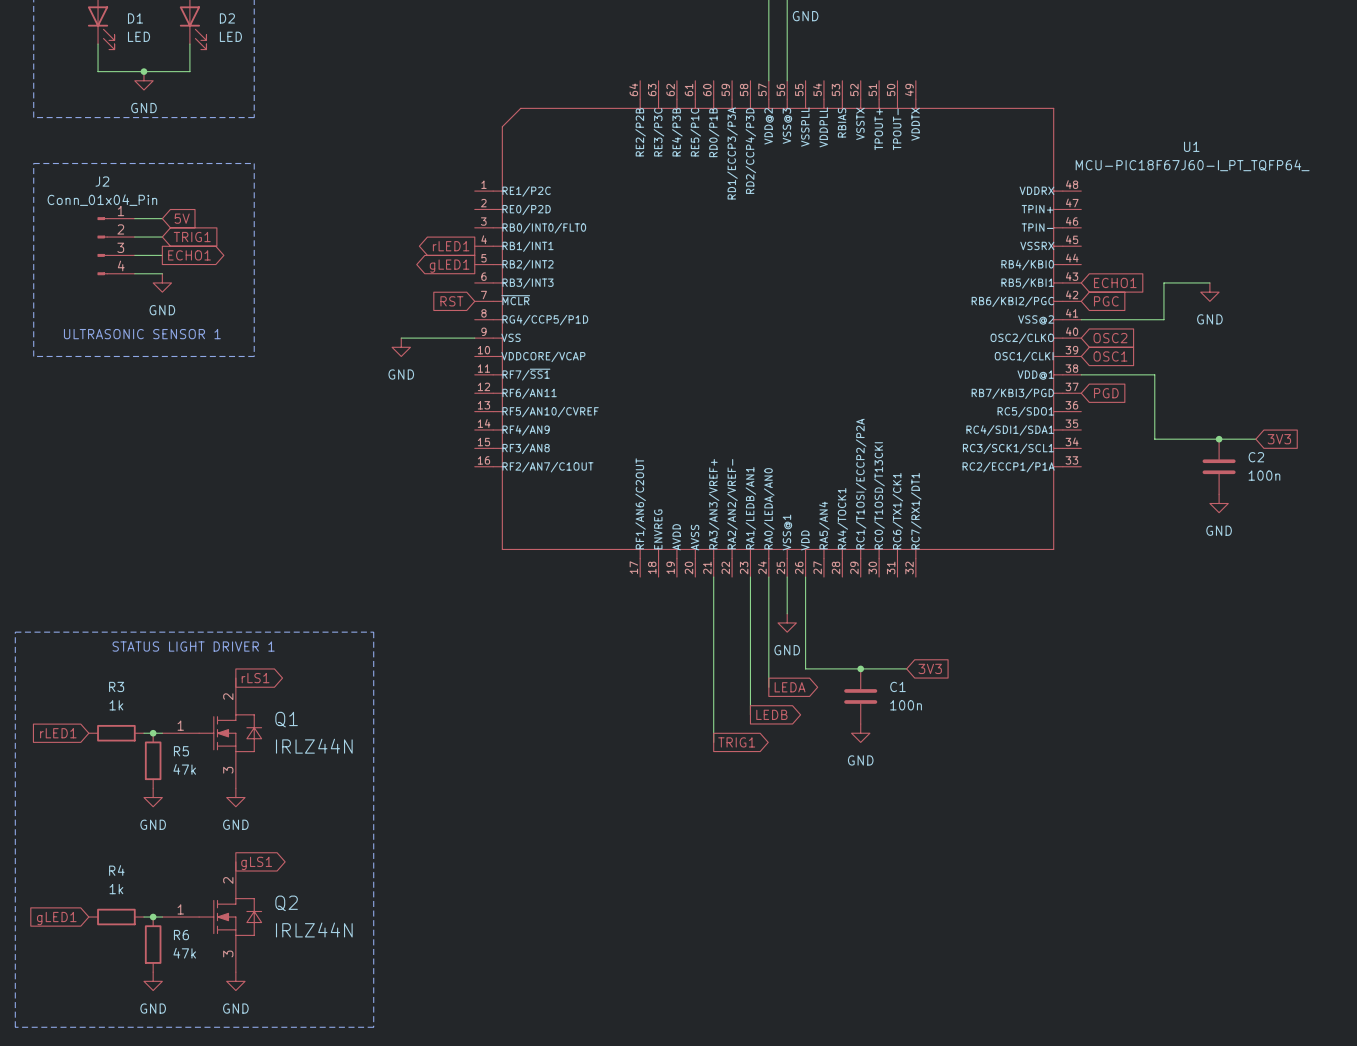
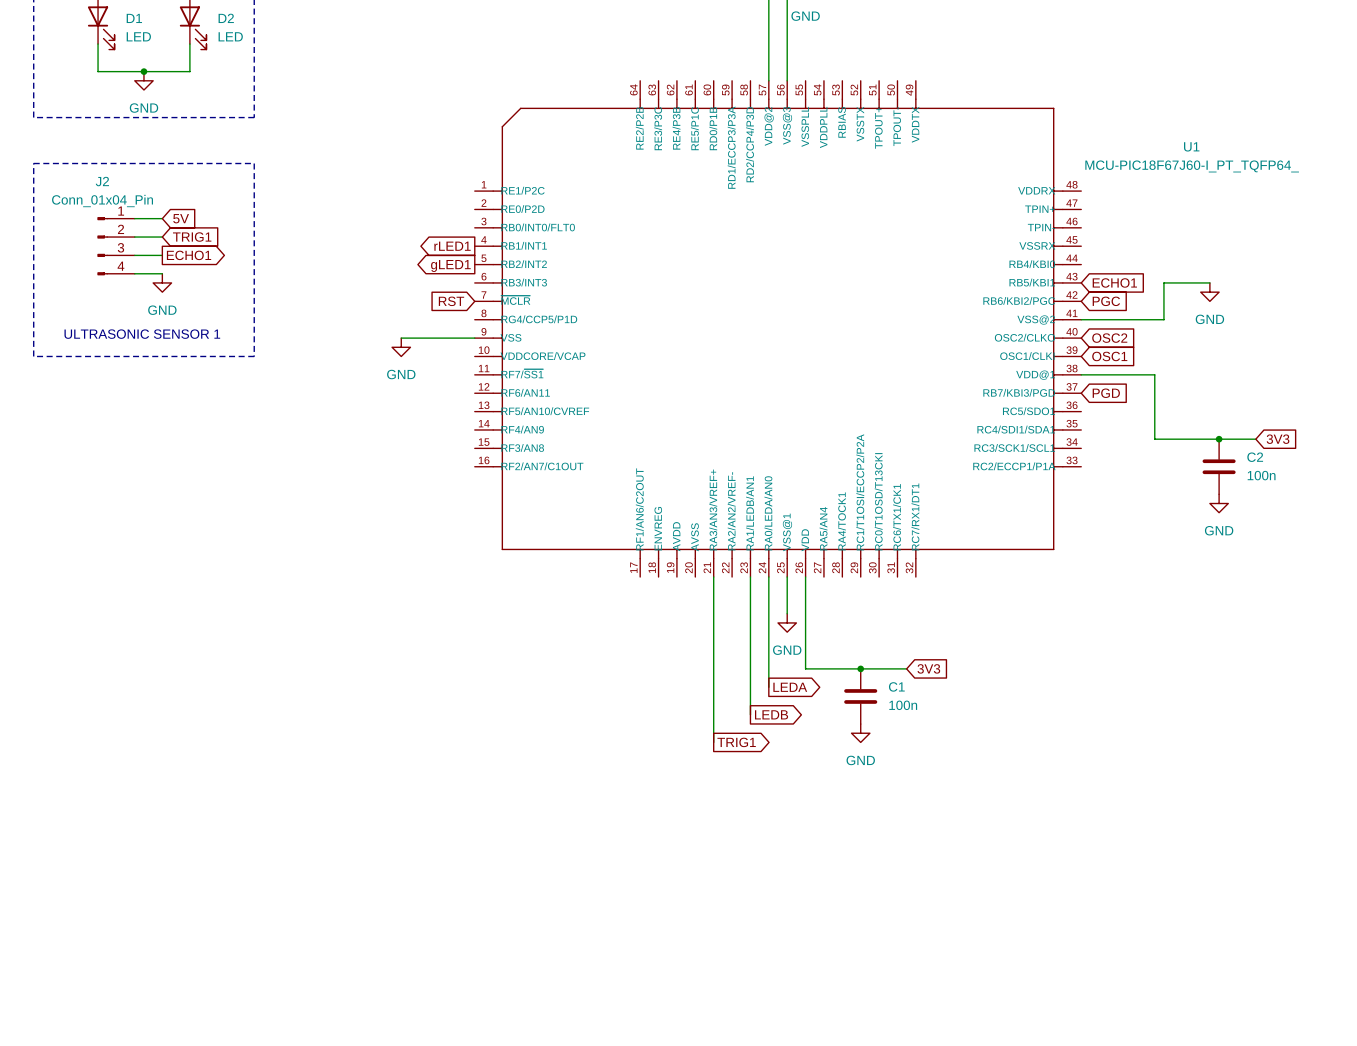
line: (15, 632) (373, 632) (373, 1027) (15, 1027) (15, 632) -> none
text: STATUS LIGHT DRIVER 1 (193, 646) -> none
global label: rLS1 (255, 678) -> none
global label: rLED1 (58, 733) -> none
R3: 1k (116, 733) -> none
wire: (143, 733) (162, 733) -> none
junction: (153, 733) -> none
Q1: IRLZ44N (211, 733) -> none
R5: 47k (153, 760) -> none
power symbol: GND (153, 797) -> none
power symbol: GND (235, 797) -> none
global label: gLS1 (256, 863) -> none
R4: 1k (116, 917) -> none
wire: (143, 917) (162, 917) -> none
junction: (153, 917) -> none
Q2: IRLZ44N (211, 917) -> none
global label: gLED1 (56, 918) -> none
R6: 47k (153, 944) -> none
power symbol: GND (153, 981) -> none
power symbol: GND (235, 981) -> none

